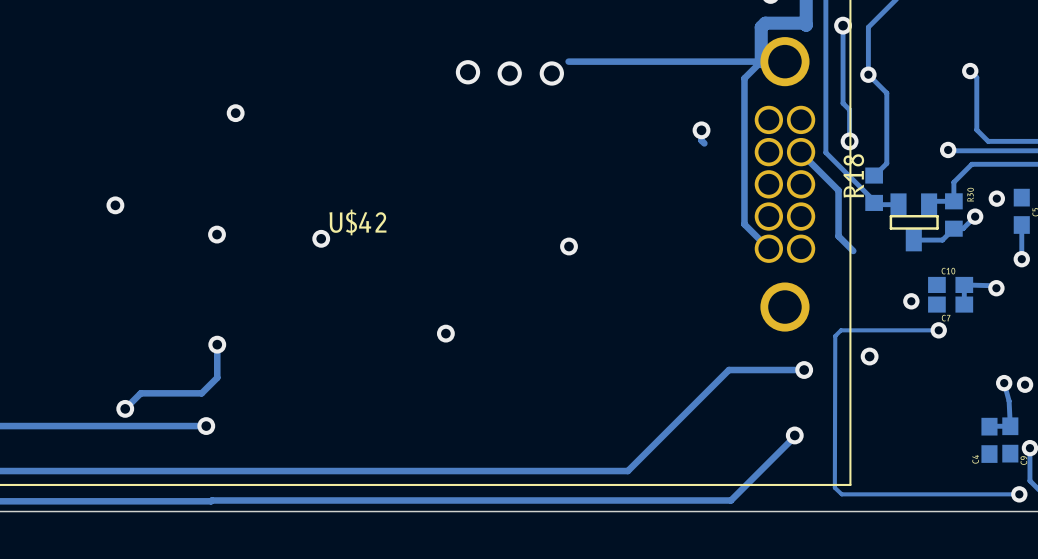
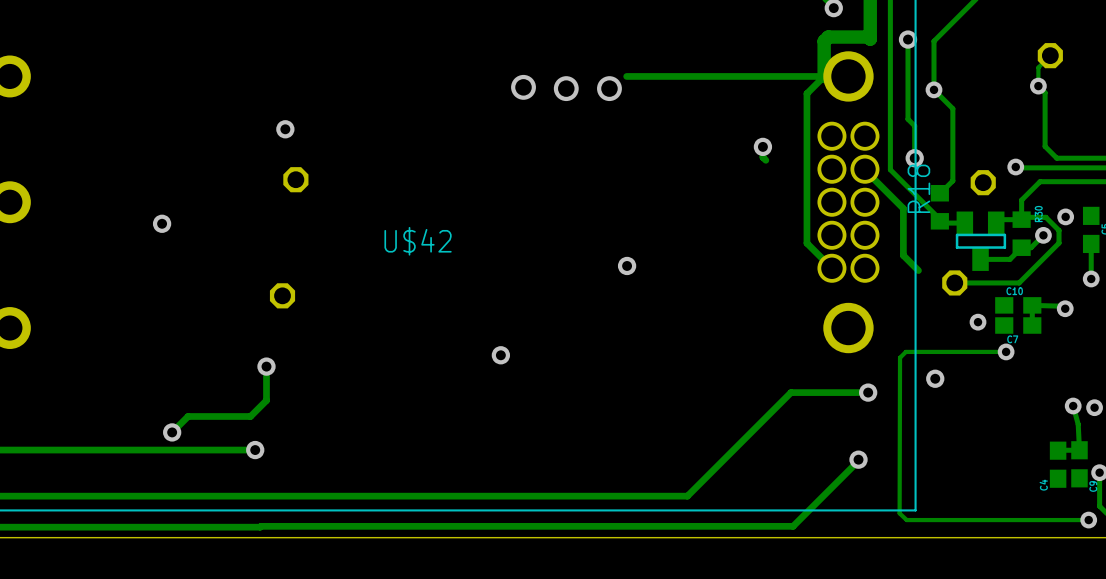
track: none -> (1050, 55) (1038, 67) (1038, 86)
part: none -> (1050, 55)
part: none -> (295, 179)
part: none -> (983, 182)
track: none -> (1021, 219) (1023, 217) (1045, 217) (1059, 230) (1059, 243) (1019, 282) (954, 282)
via: (217, 234) -> none
via: (321, 238) -> none
part: none -> (954, 282)
part: none -> (282, 295)

